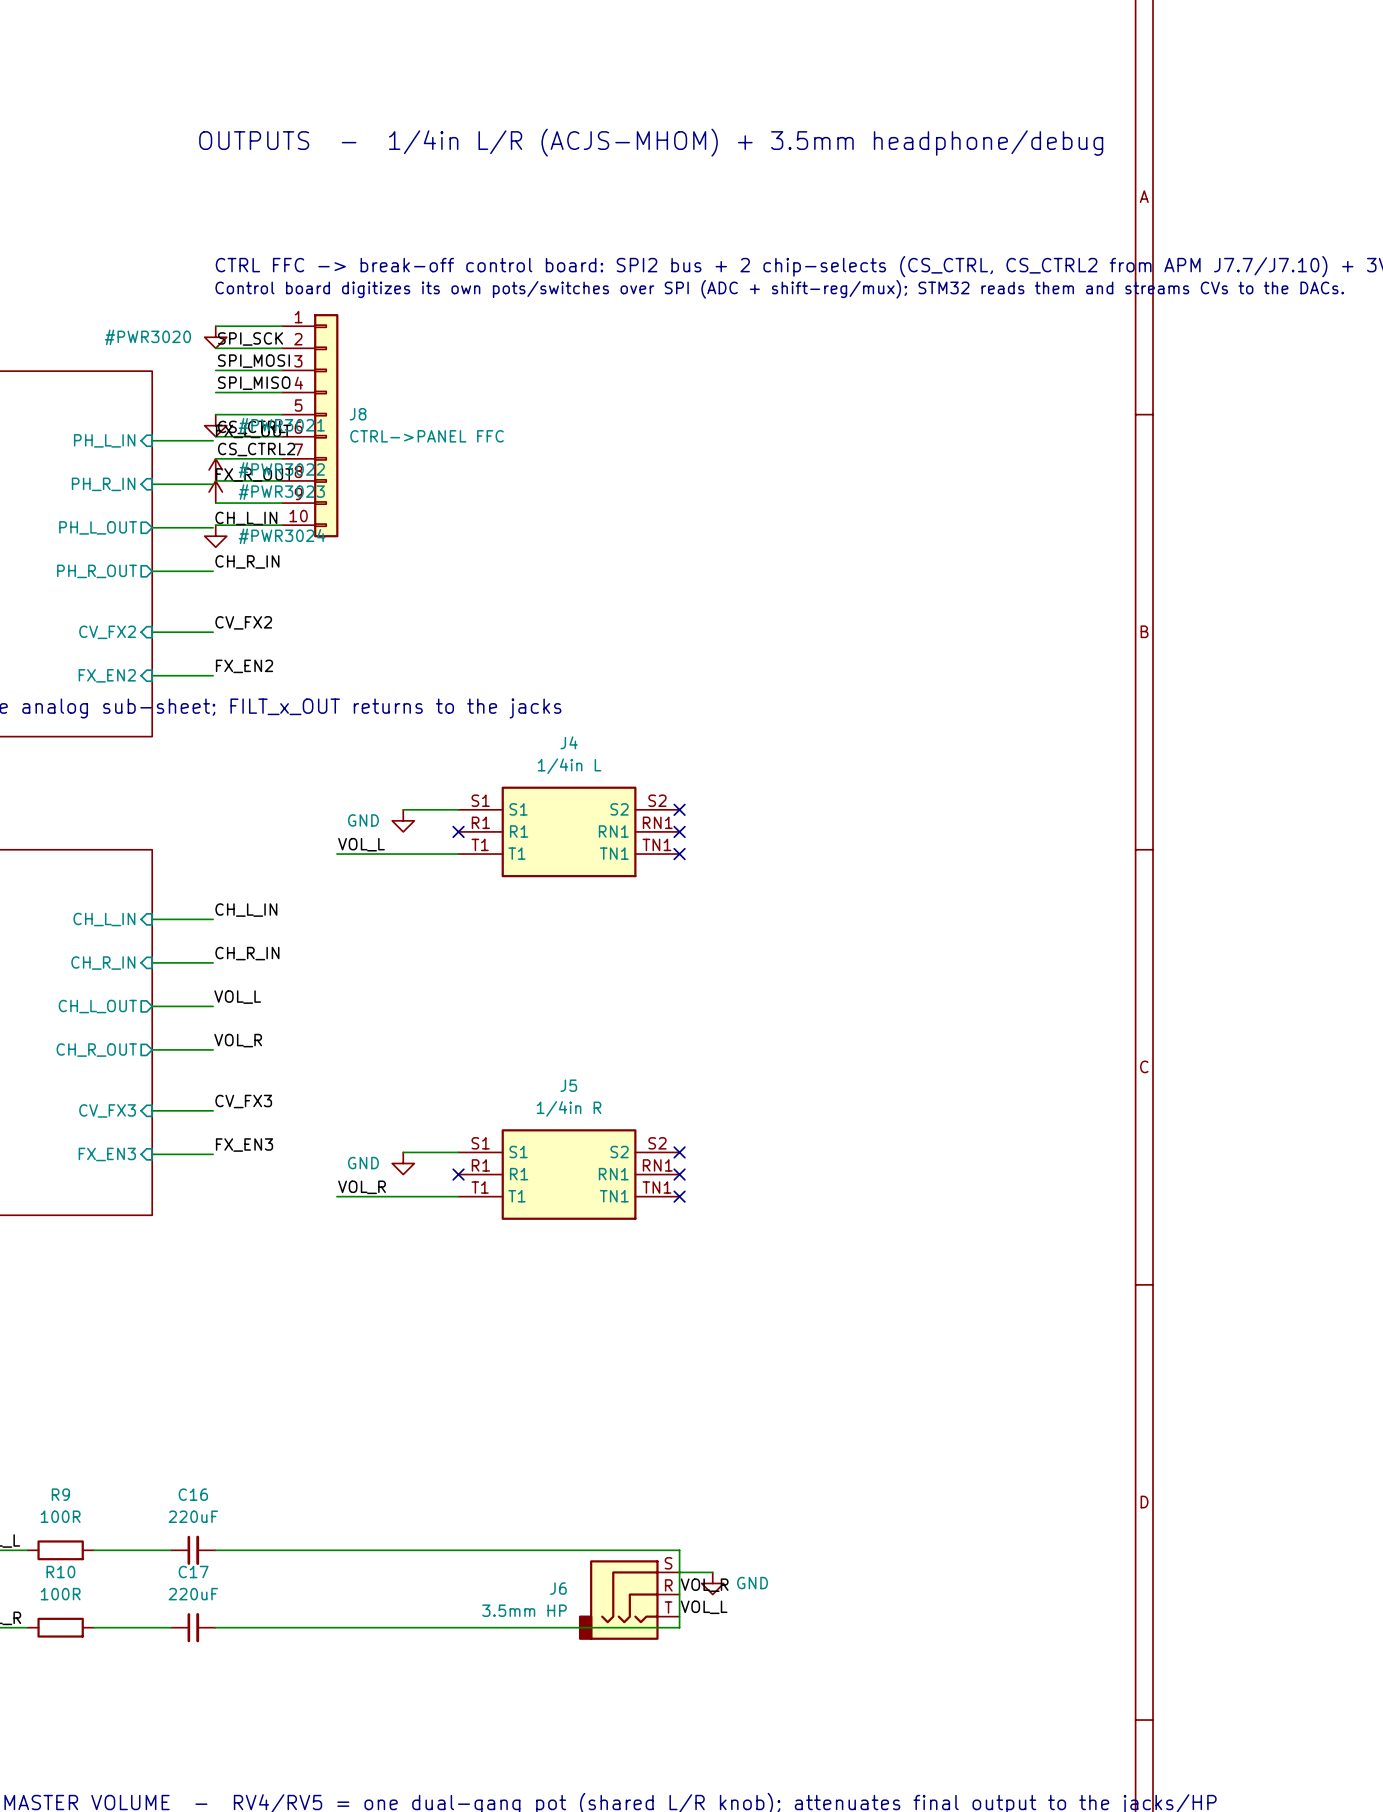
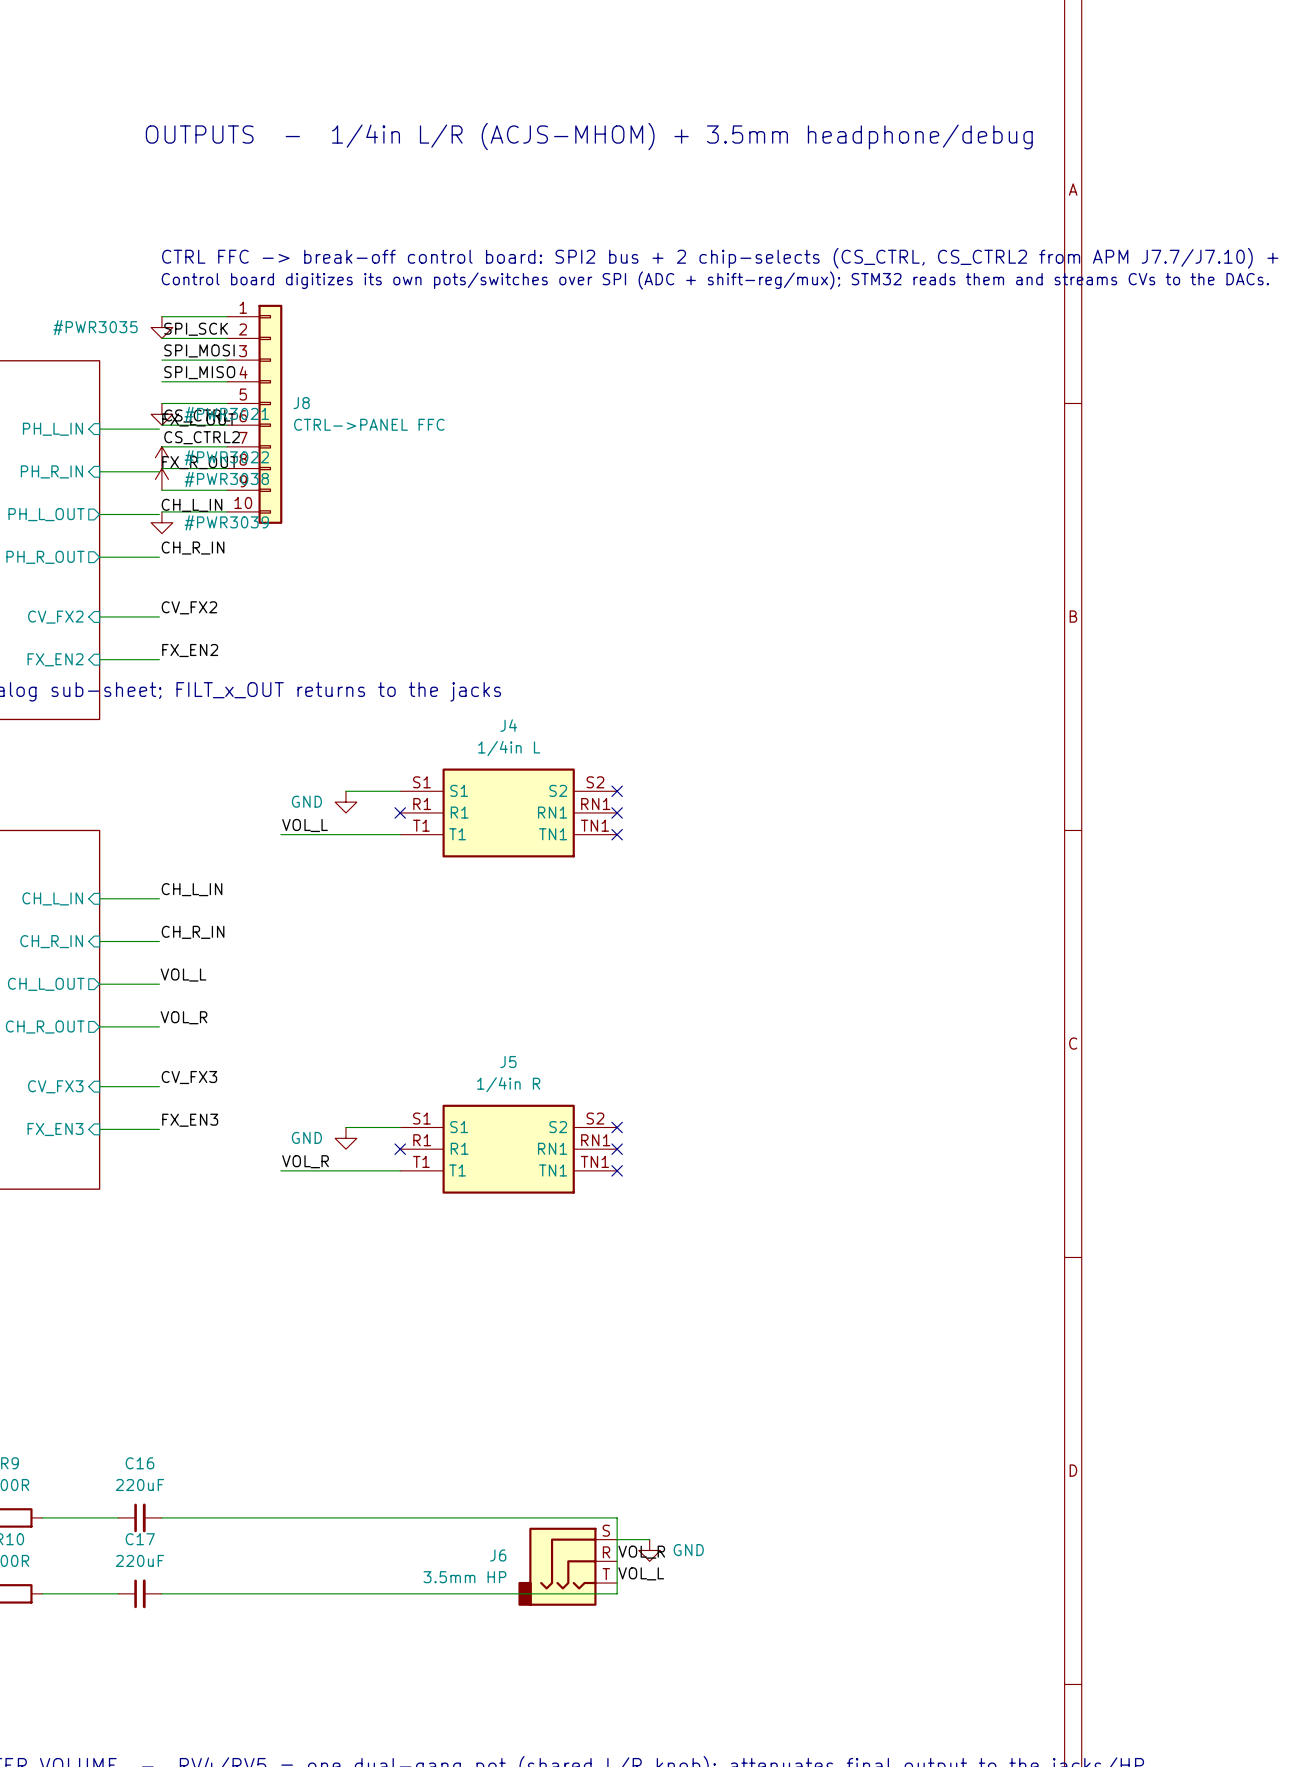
#PWR3020 name: #PWR3020 (147, 337) -> #PWR3035 (95, 327)
#PWR3023 name: #PWR3023 (281, 492) -> #PWR3038 (226, 479)
#PWR3024 name: #PWR3024 (282, 536) -> #PWR3039 (226, 522)

